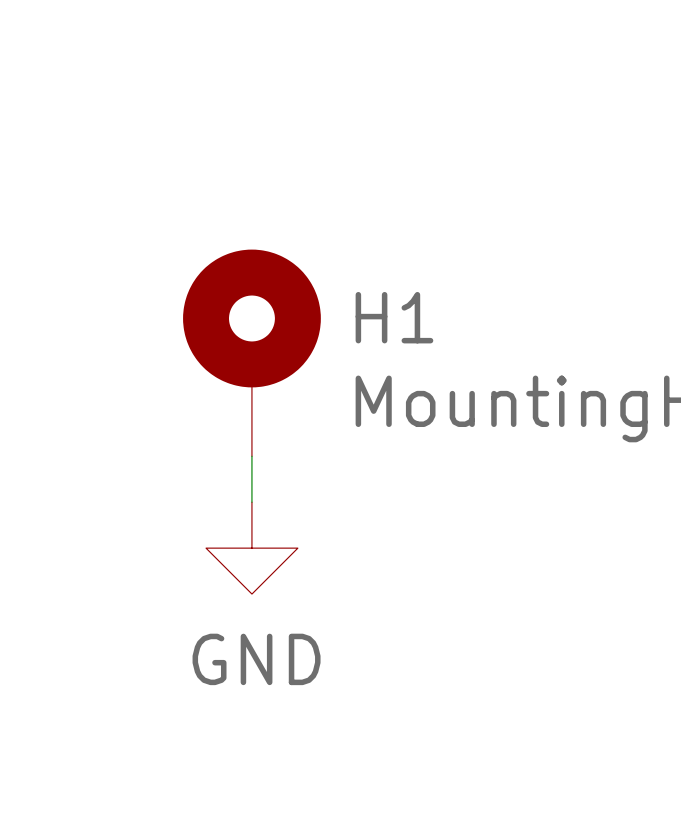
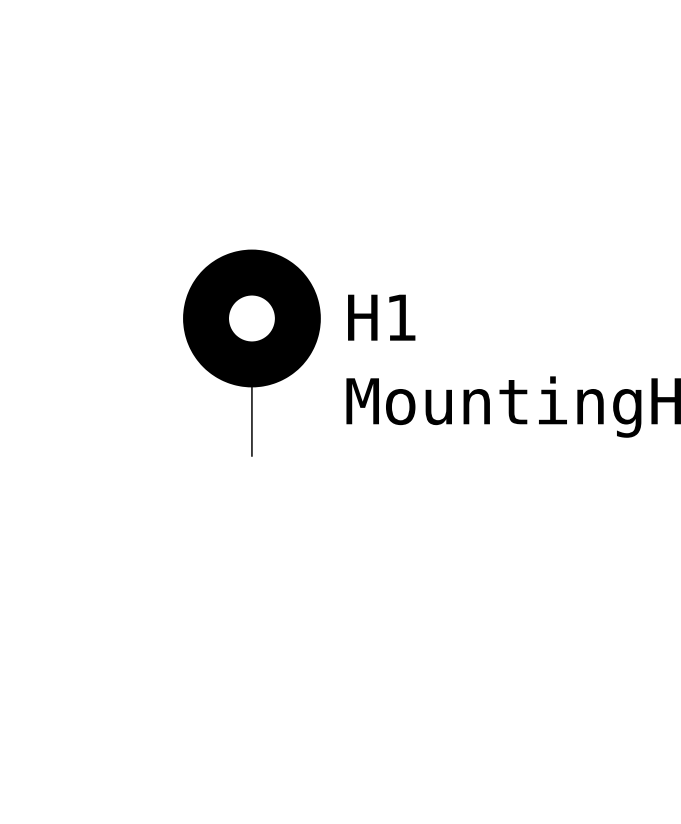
wire: (251, 456) (251, 502) -> none
power symbol: GND (251, 548) -> none

